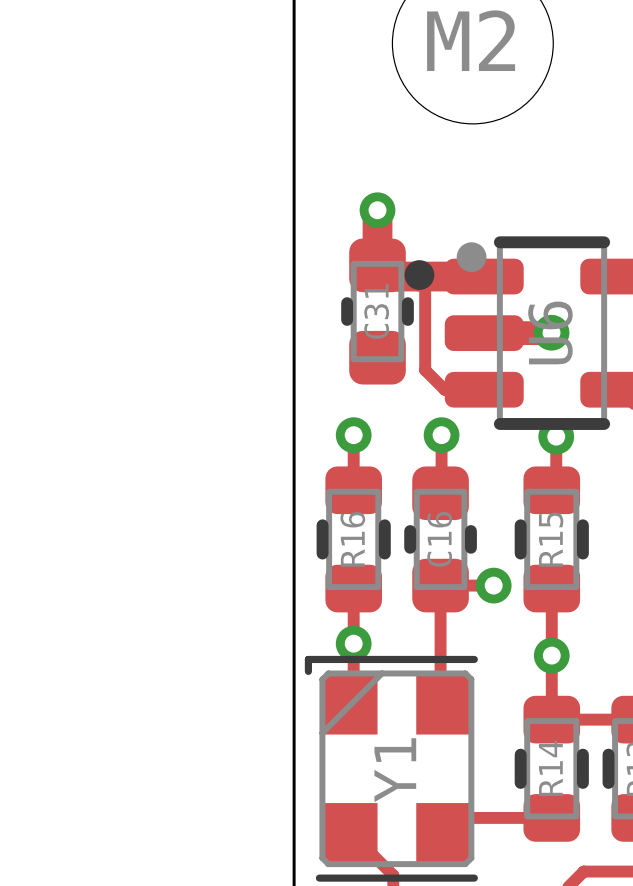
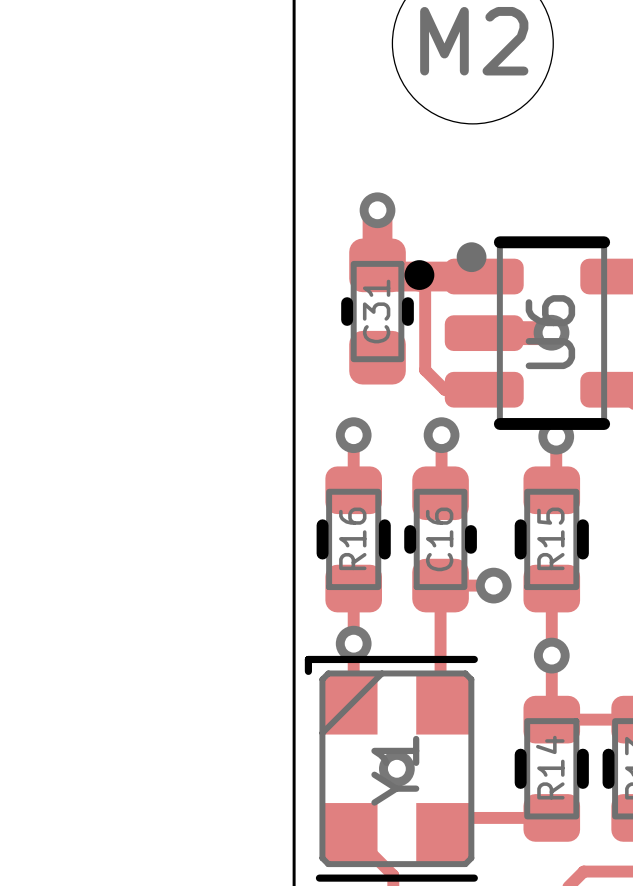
via: none -> (396, 768)

